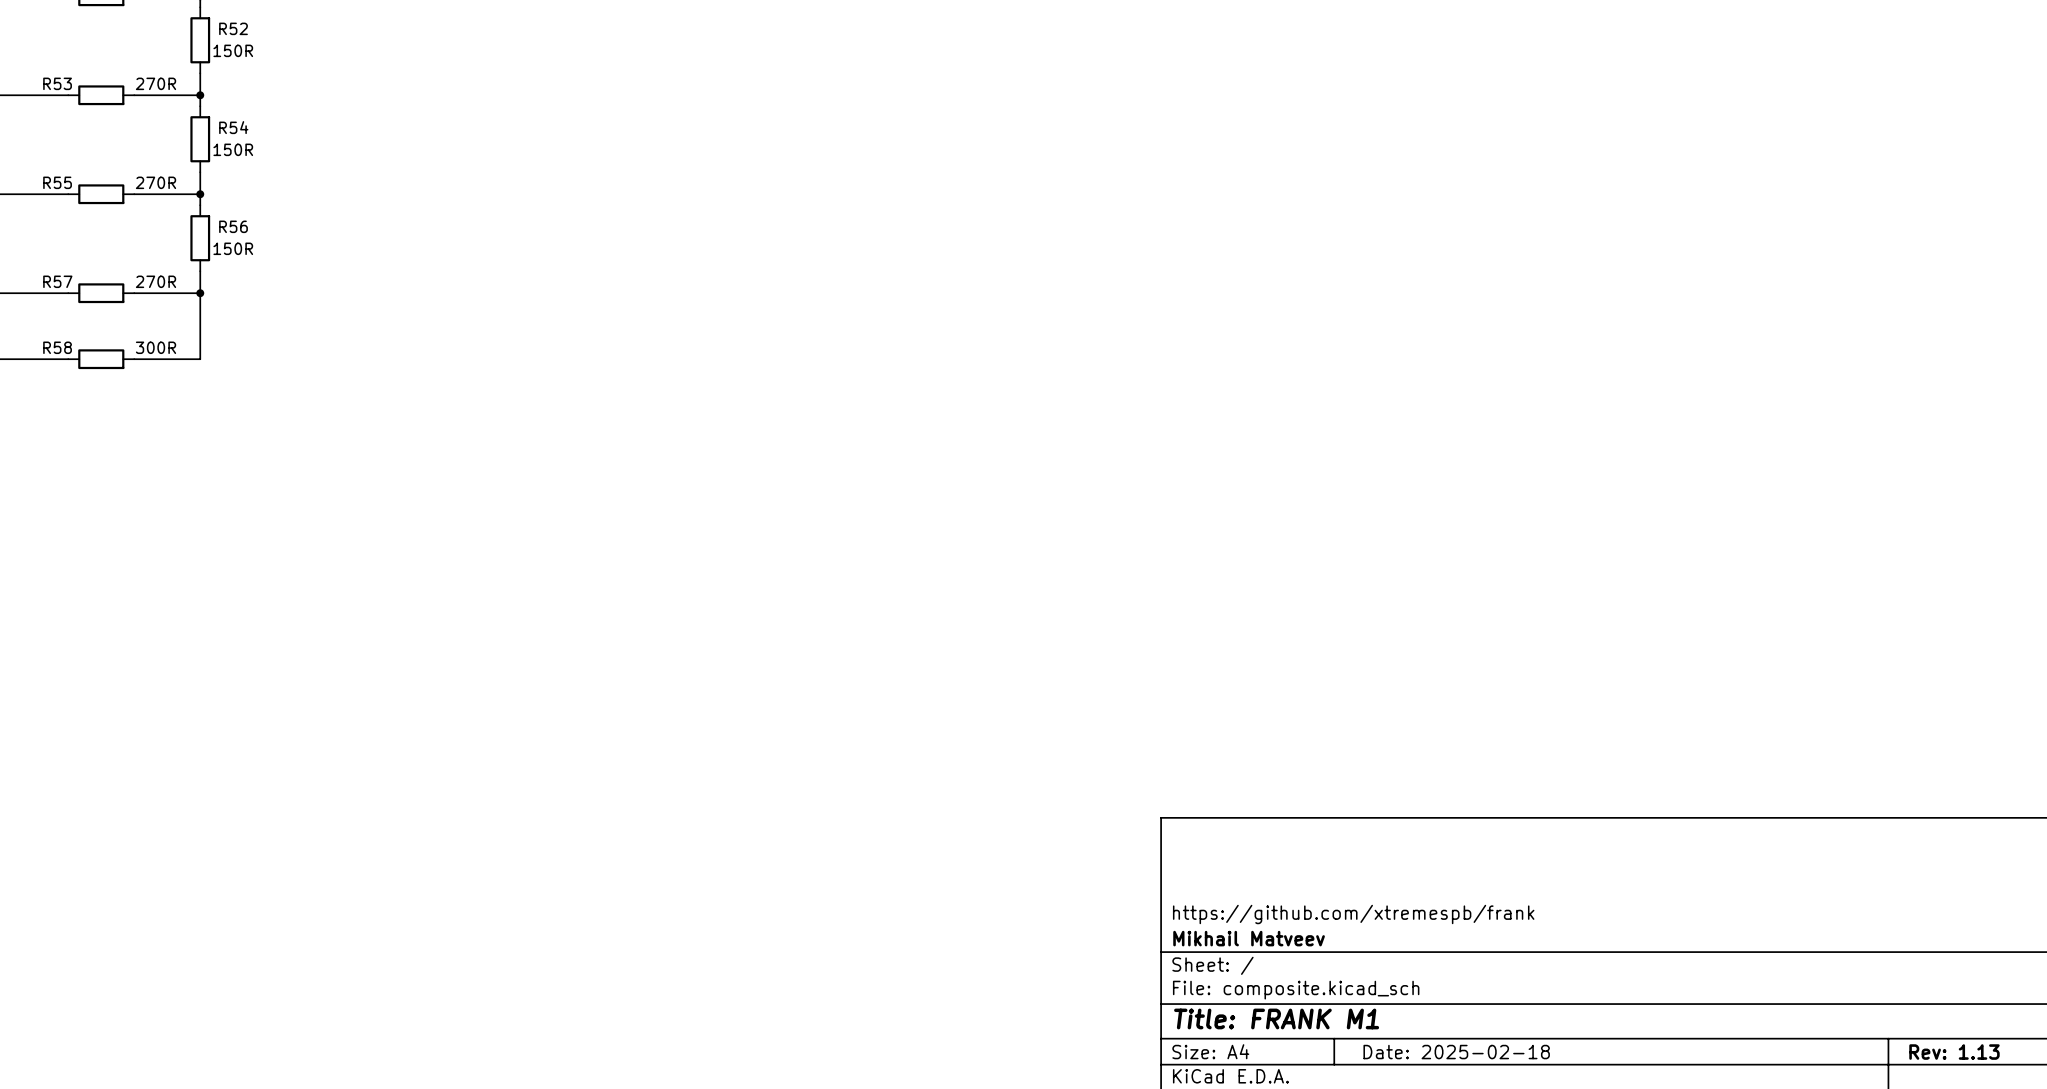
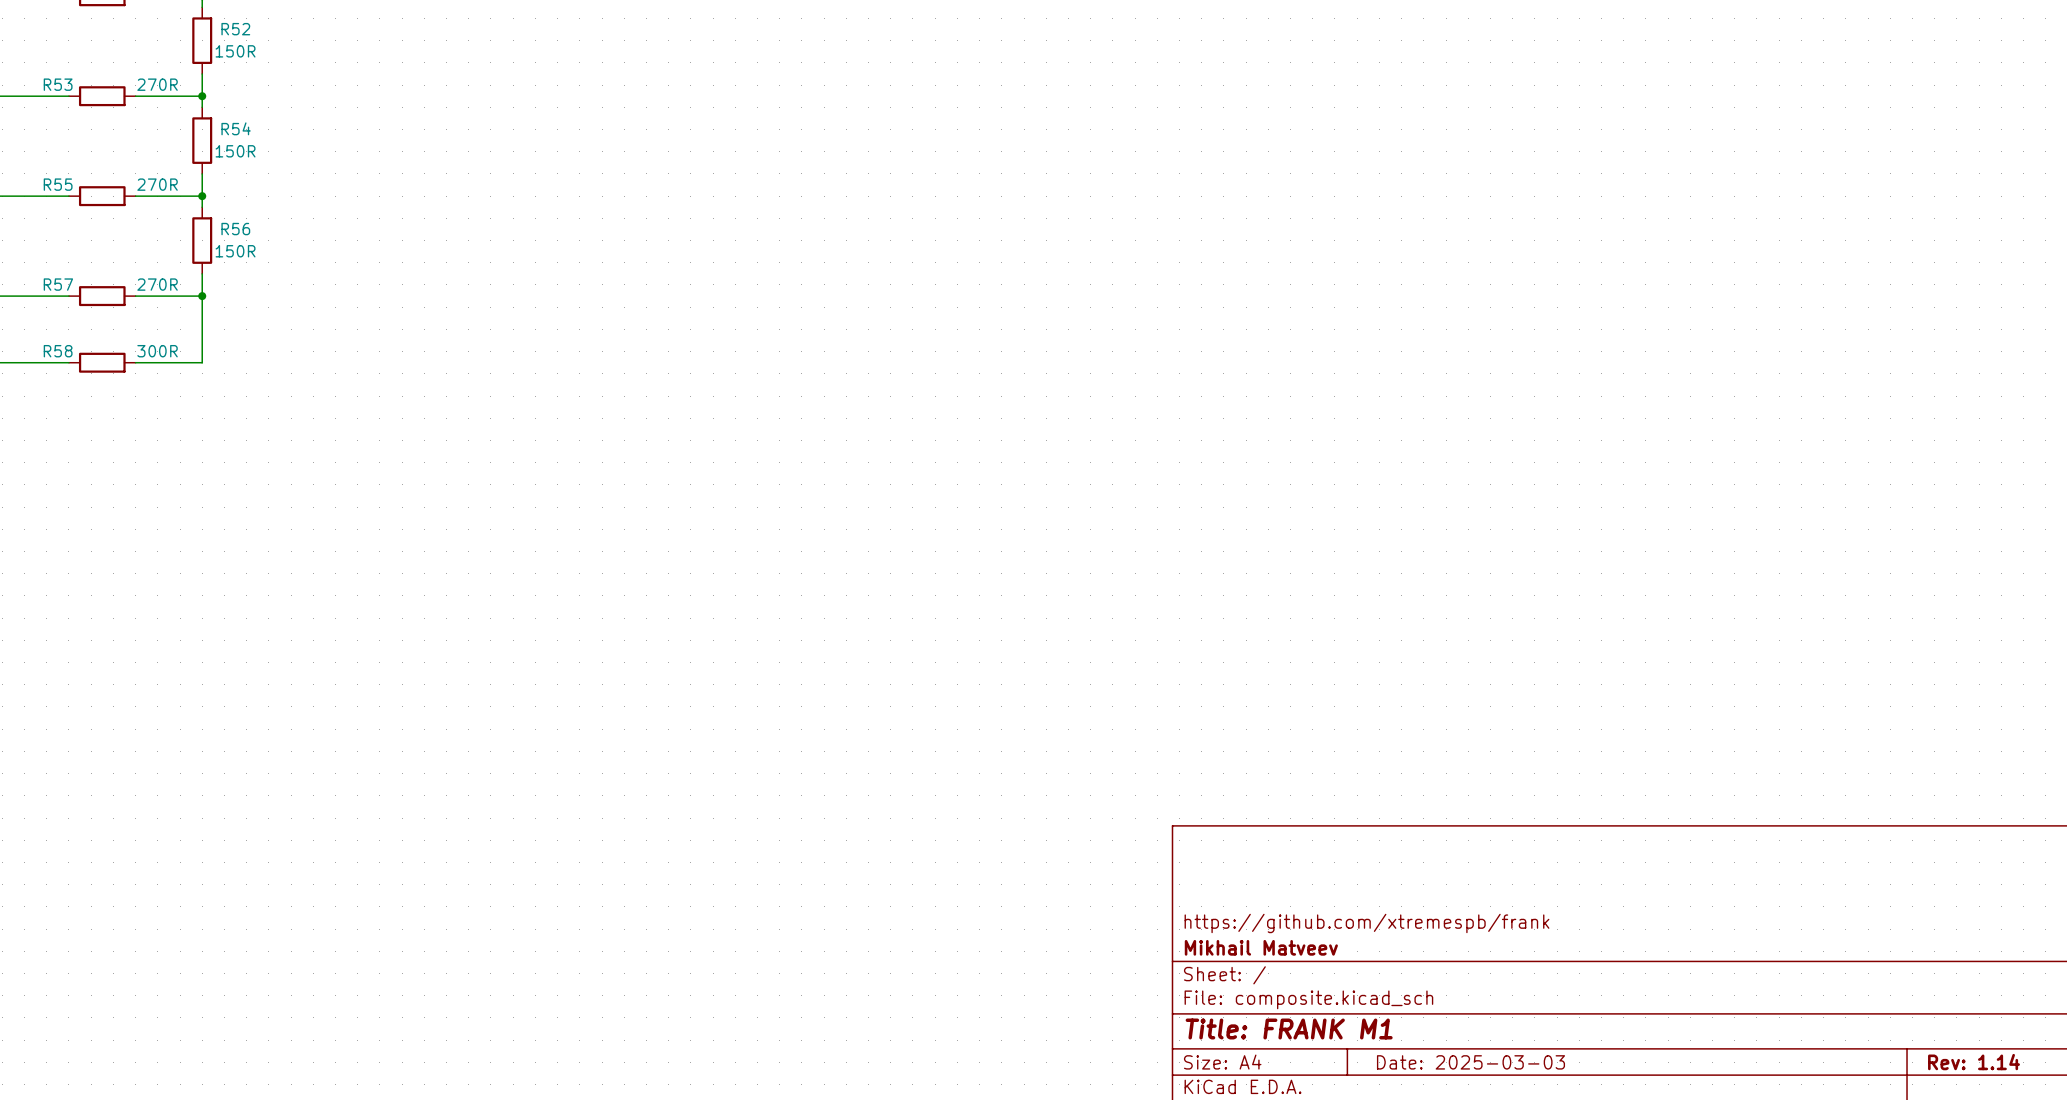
title block: Date: 2025-02-18 (1456, 1052) -> Date: 2025-03-03 (1470, 1062)
title block: Rev: 1.13 (1954, 1052) -> Rev: 1.14 (1974, 1062)

